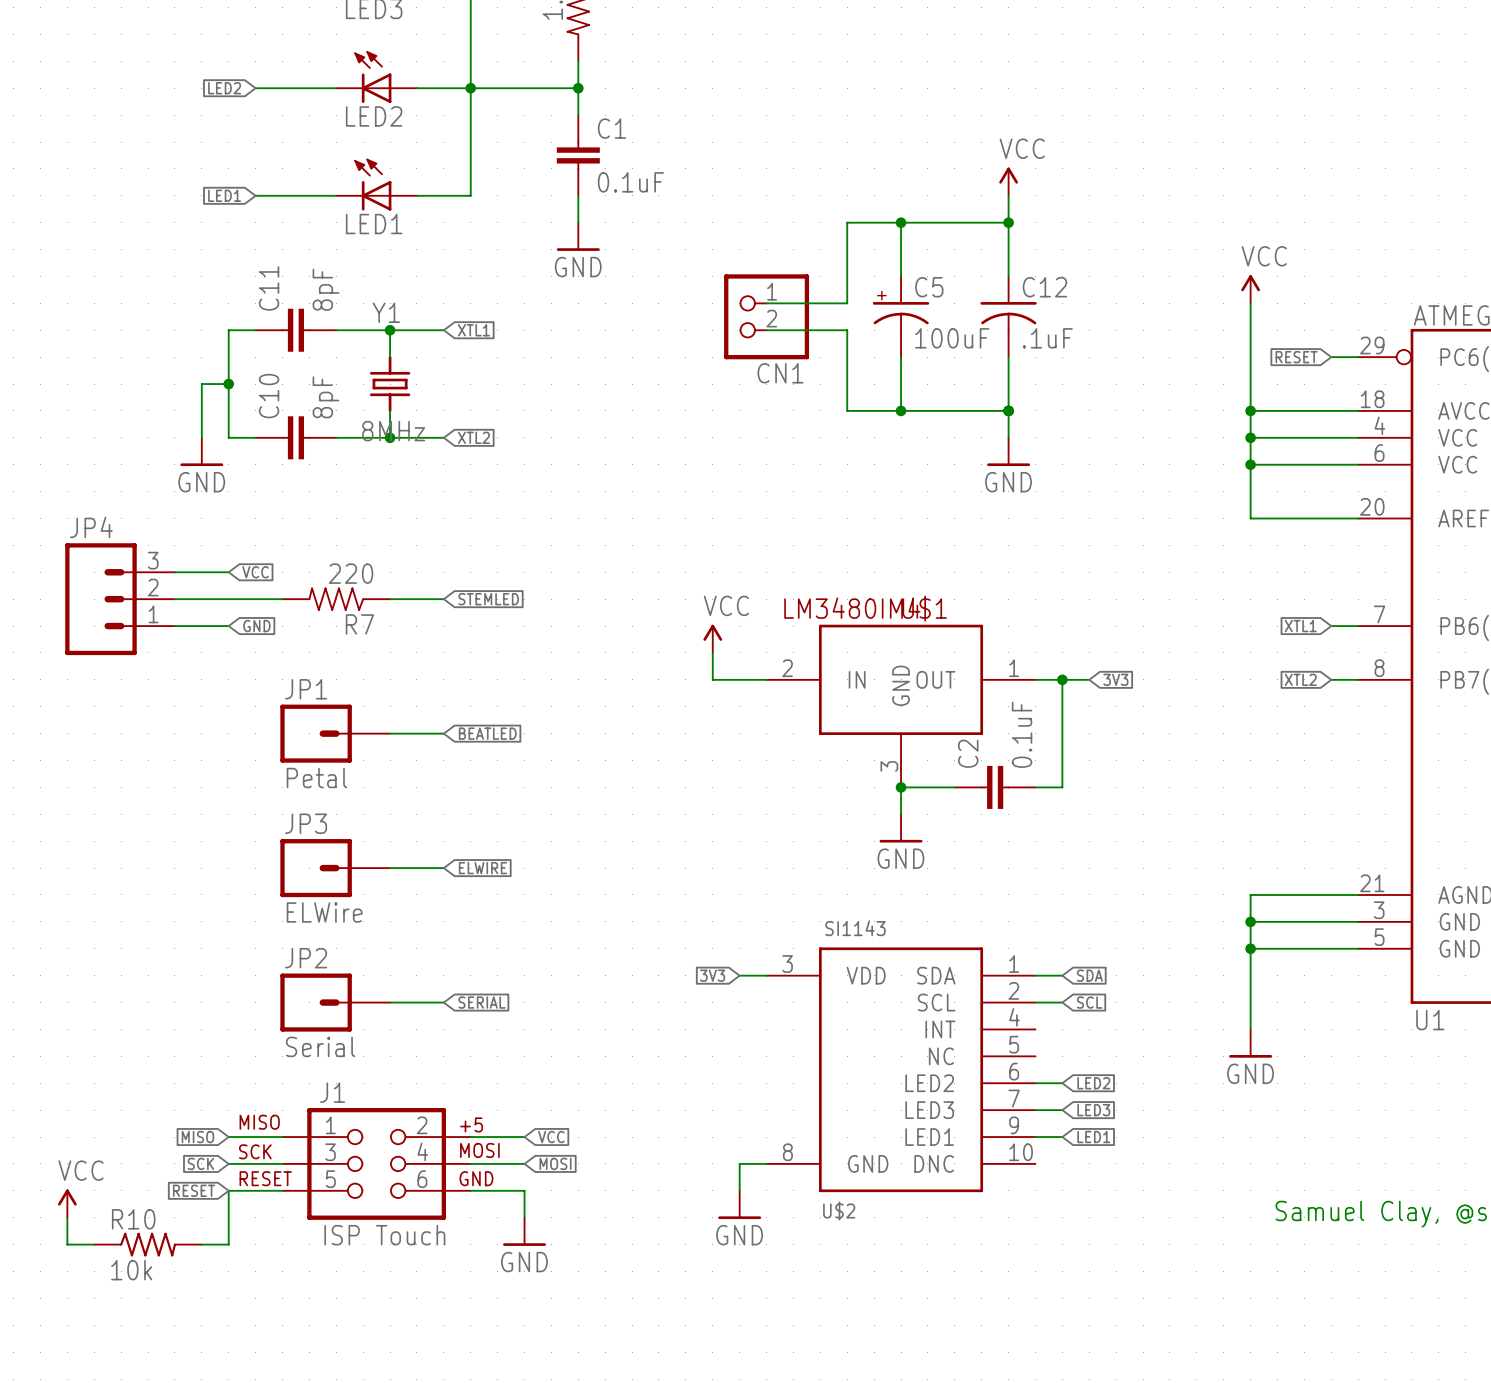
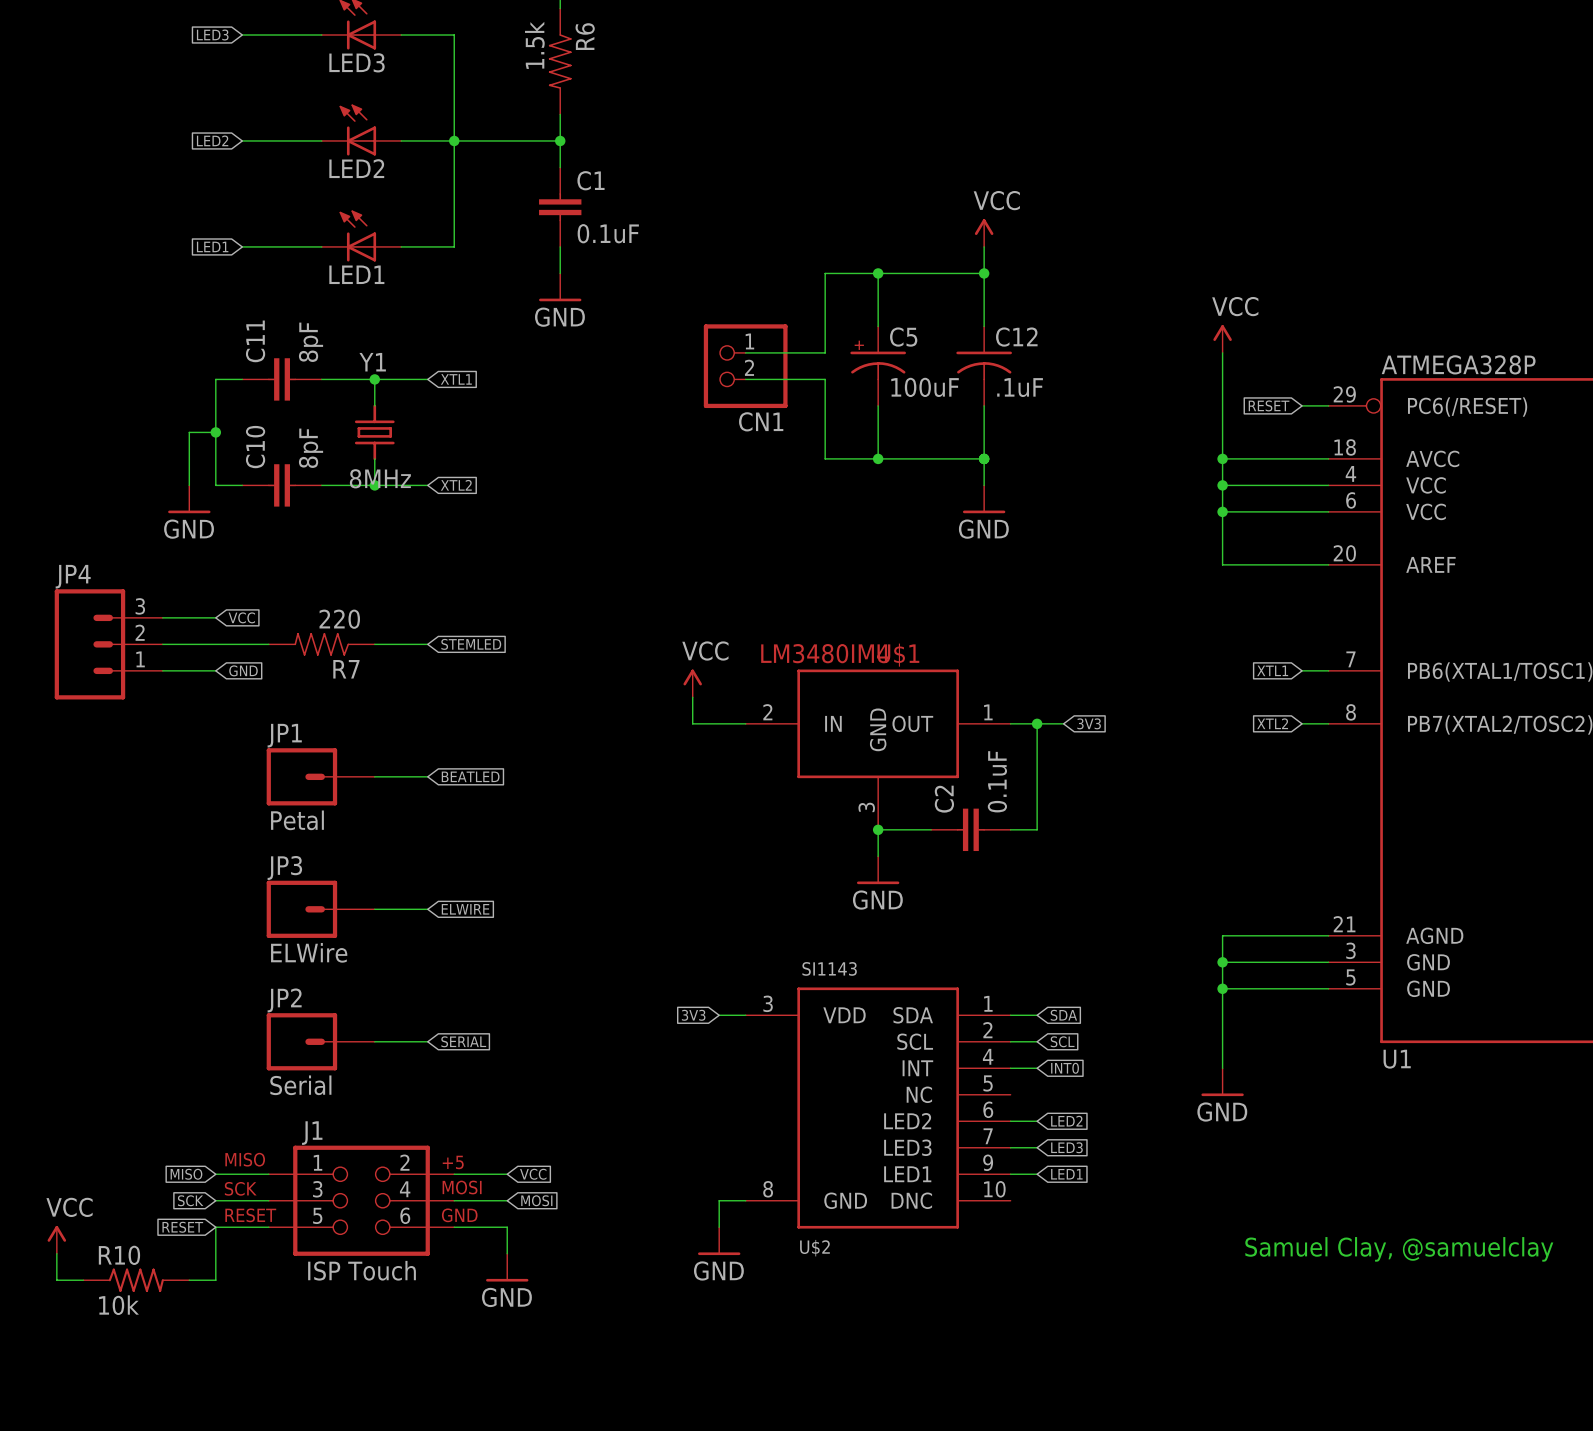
wire: none -> (1010, 1068) (1037, 1068)
global label: none -> INT0 (1065, 1068)

